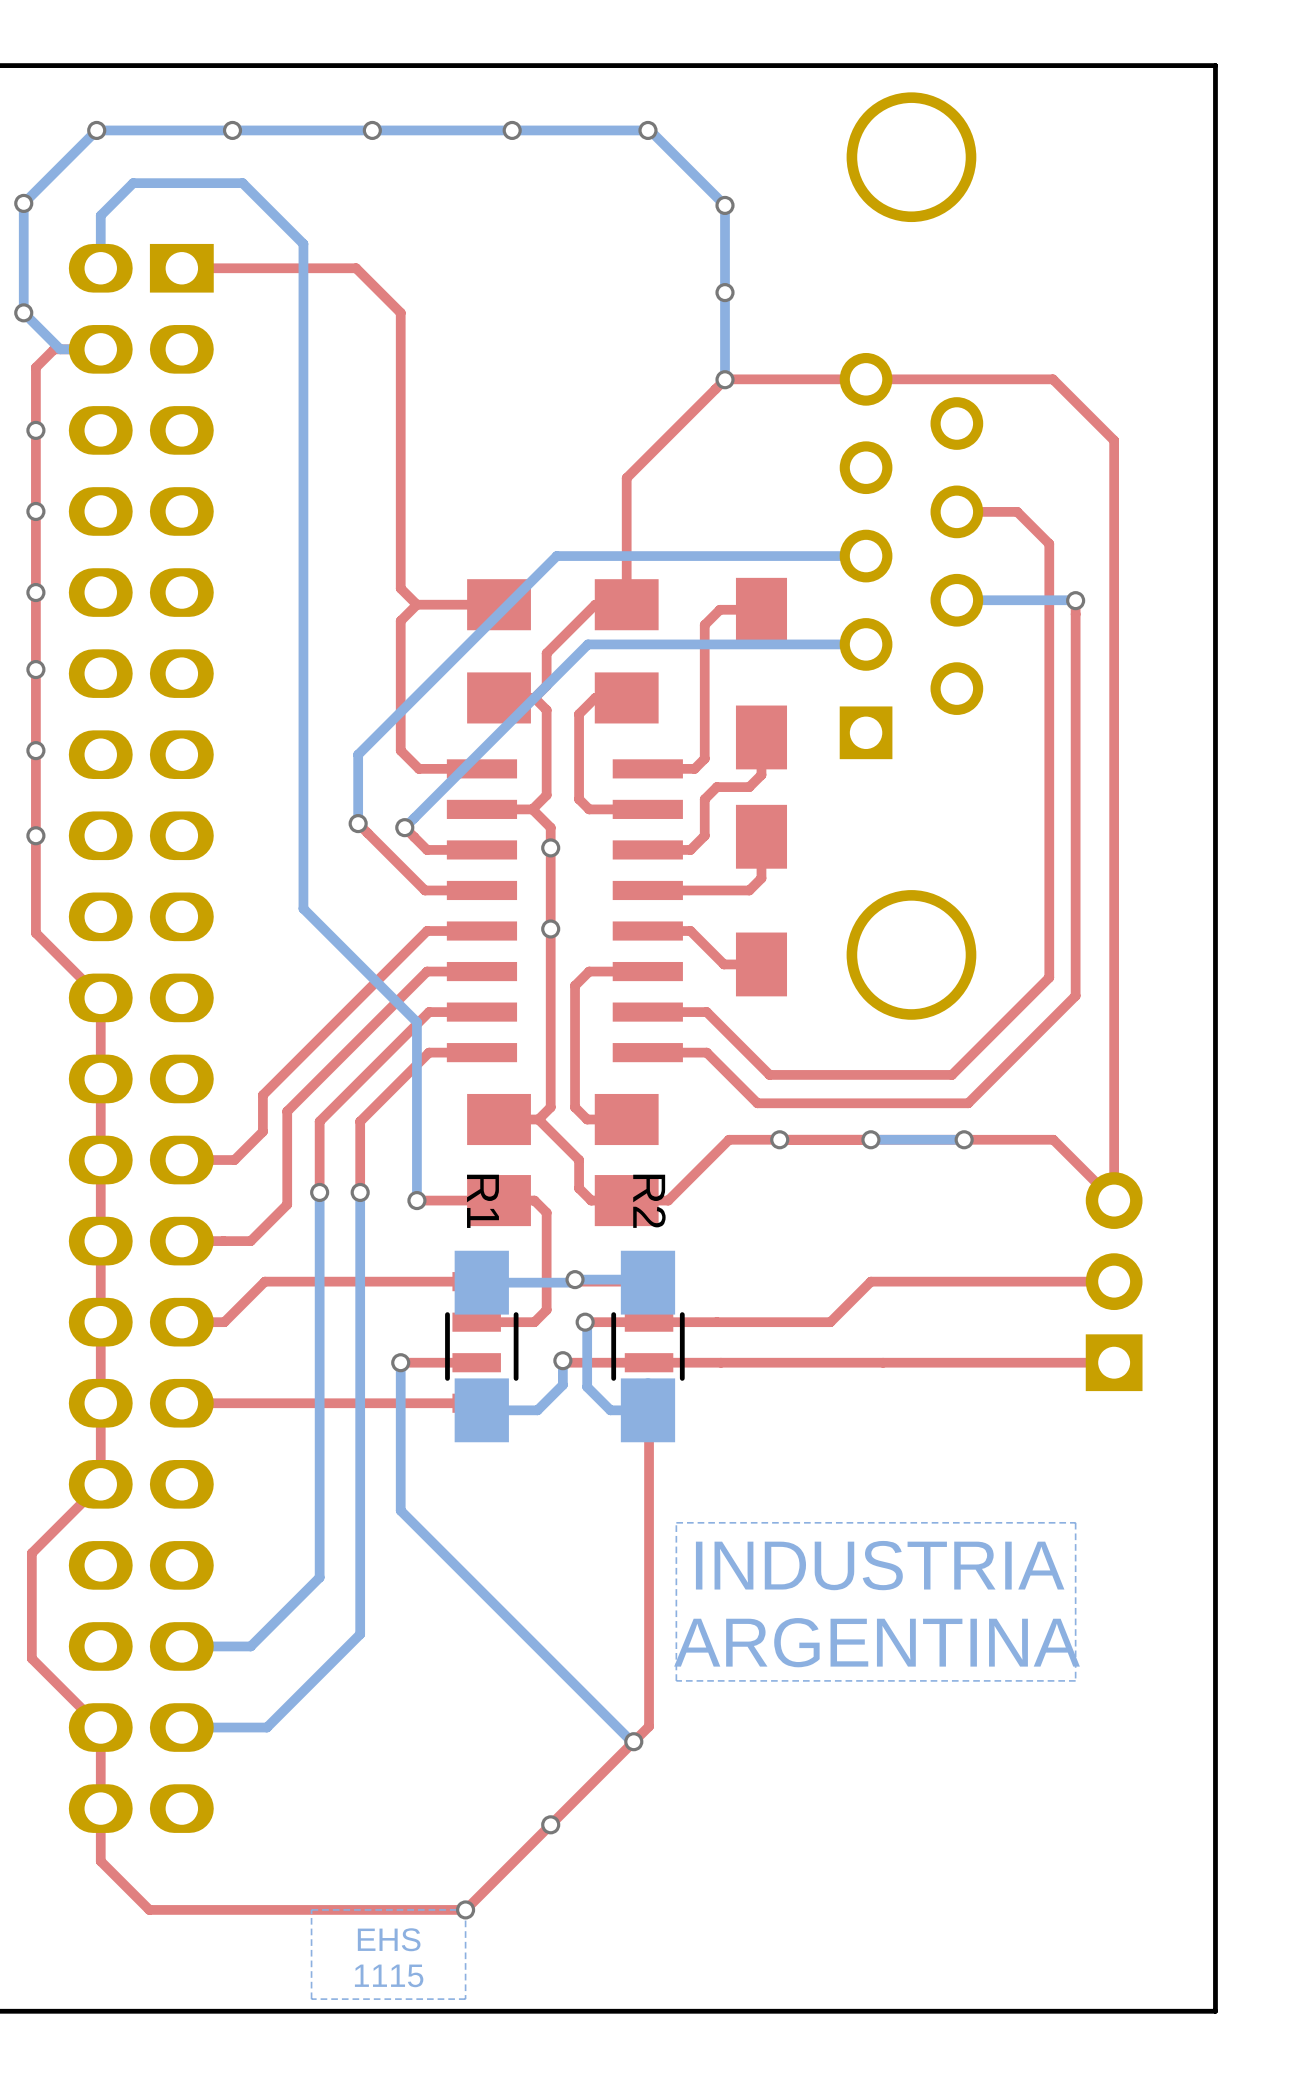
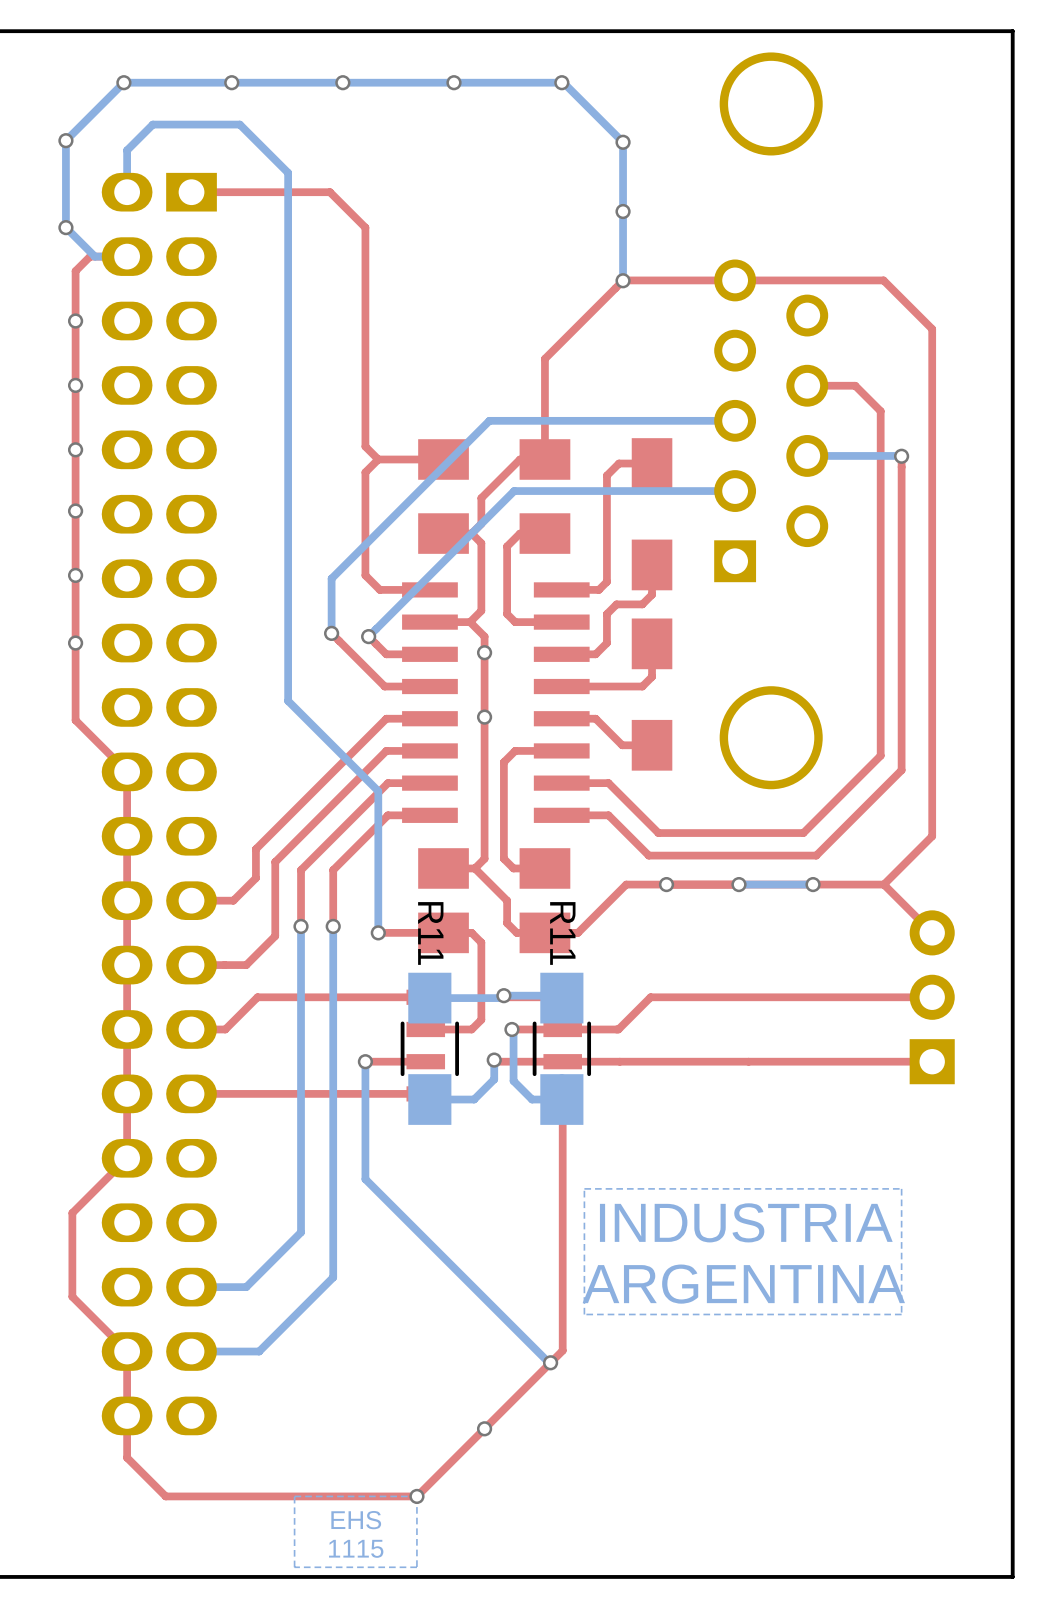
top track: (1114, 1078) (1114, 1200) -> (932, 836) (883, 884)
R1 name: R1 (482, 1201) -> R11 (430, 933)
R2 name: R2 (649, 1201) -> R11 (562, 933)
top track: (870, 1281) (830, 1322) (719, 1322) -> (738, 997) (650, 997) (618, 1029)

